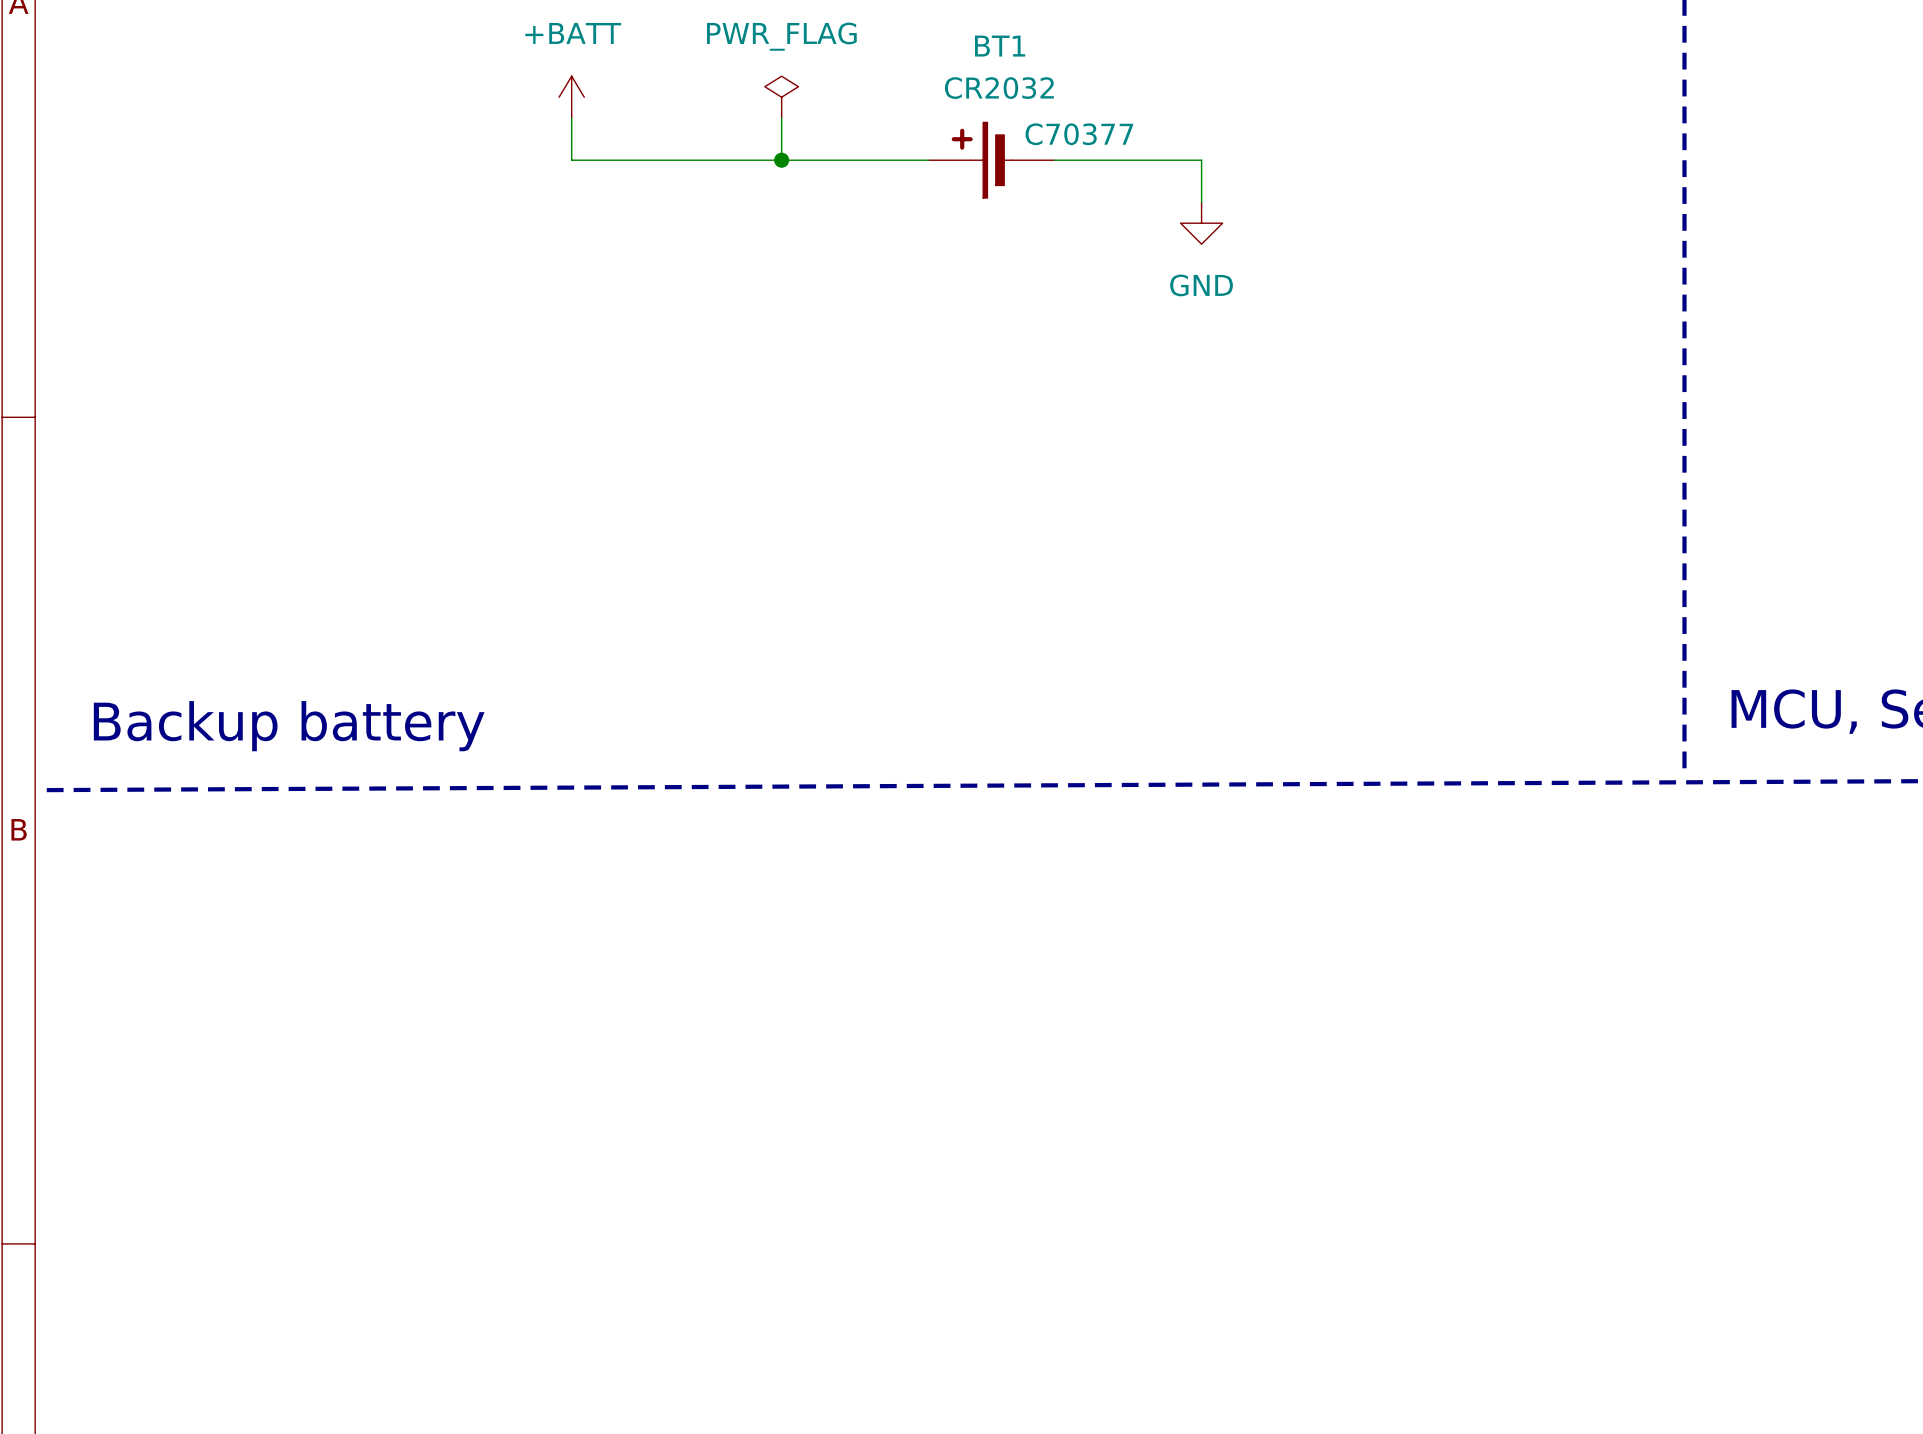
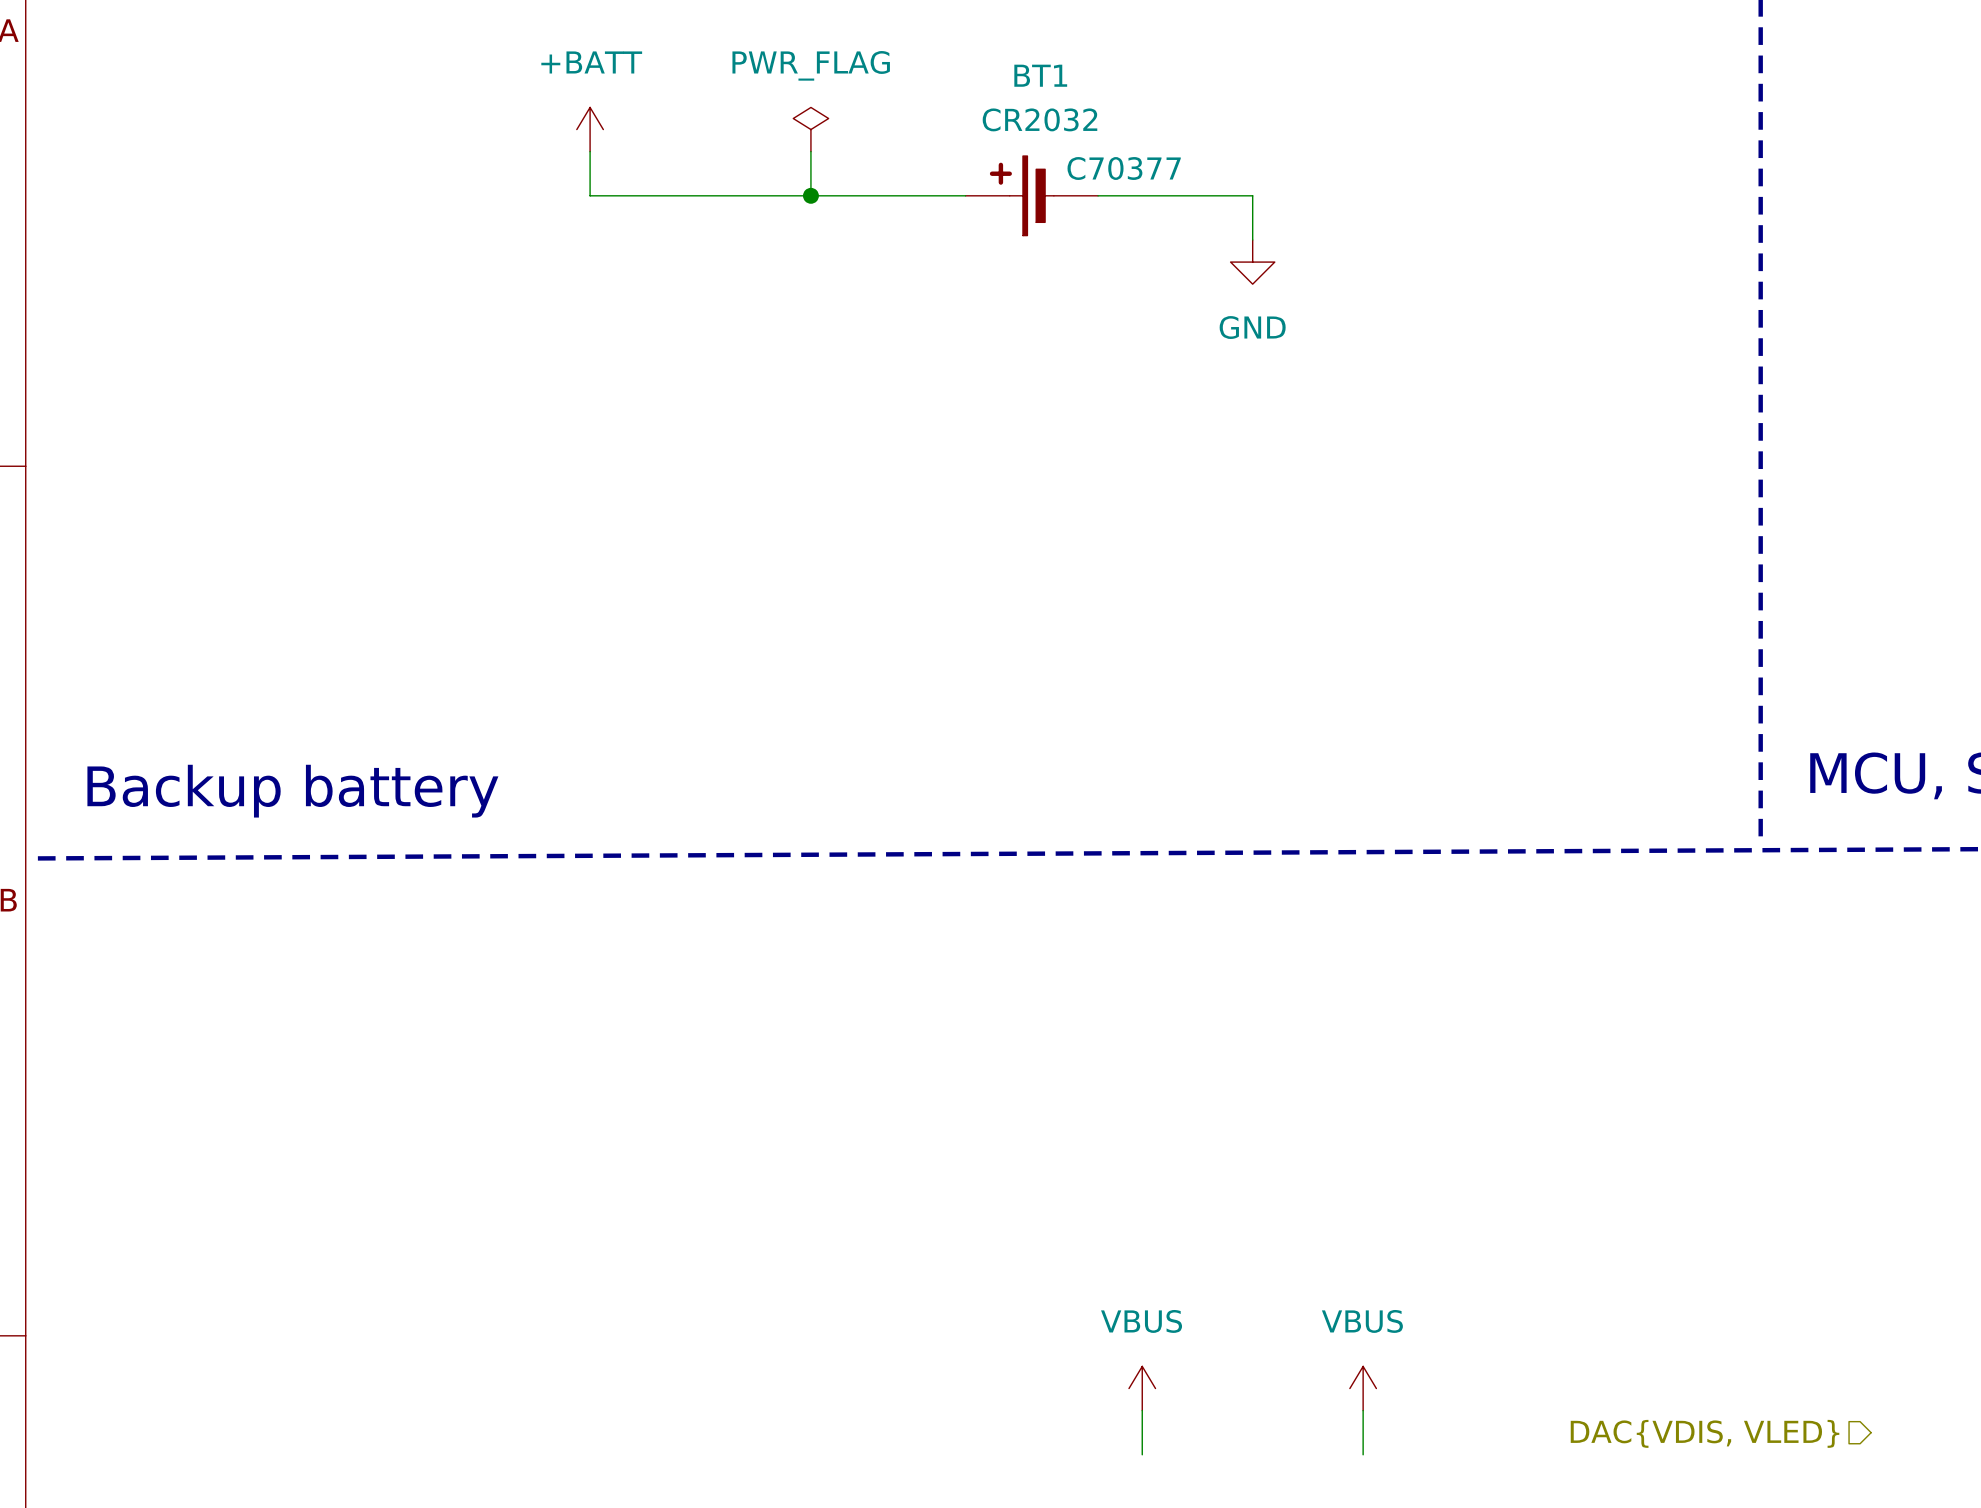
power symbol: none -> VBUS (1142, 1388)
power symbol: none -> VBUS (1363, 1388)
wire: none -> (1142, 1410) (1142, 1454)
wire: none -> (1363, 1410) (1363, 1454)
hierarchical label: none -> DAC{VDIS, VLED} (1705, 1433)

